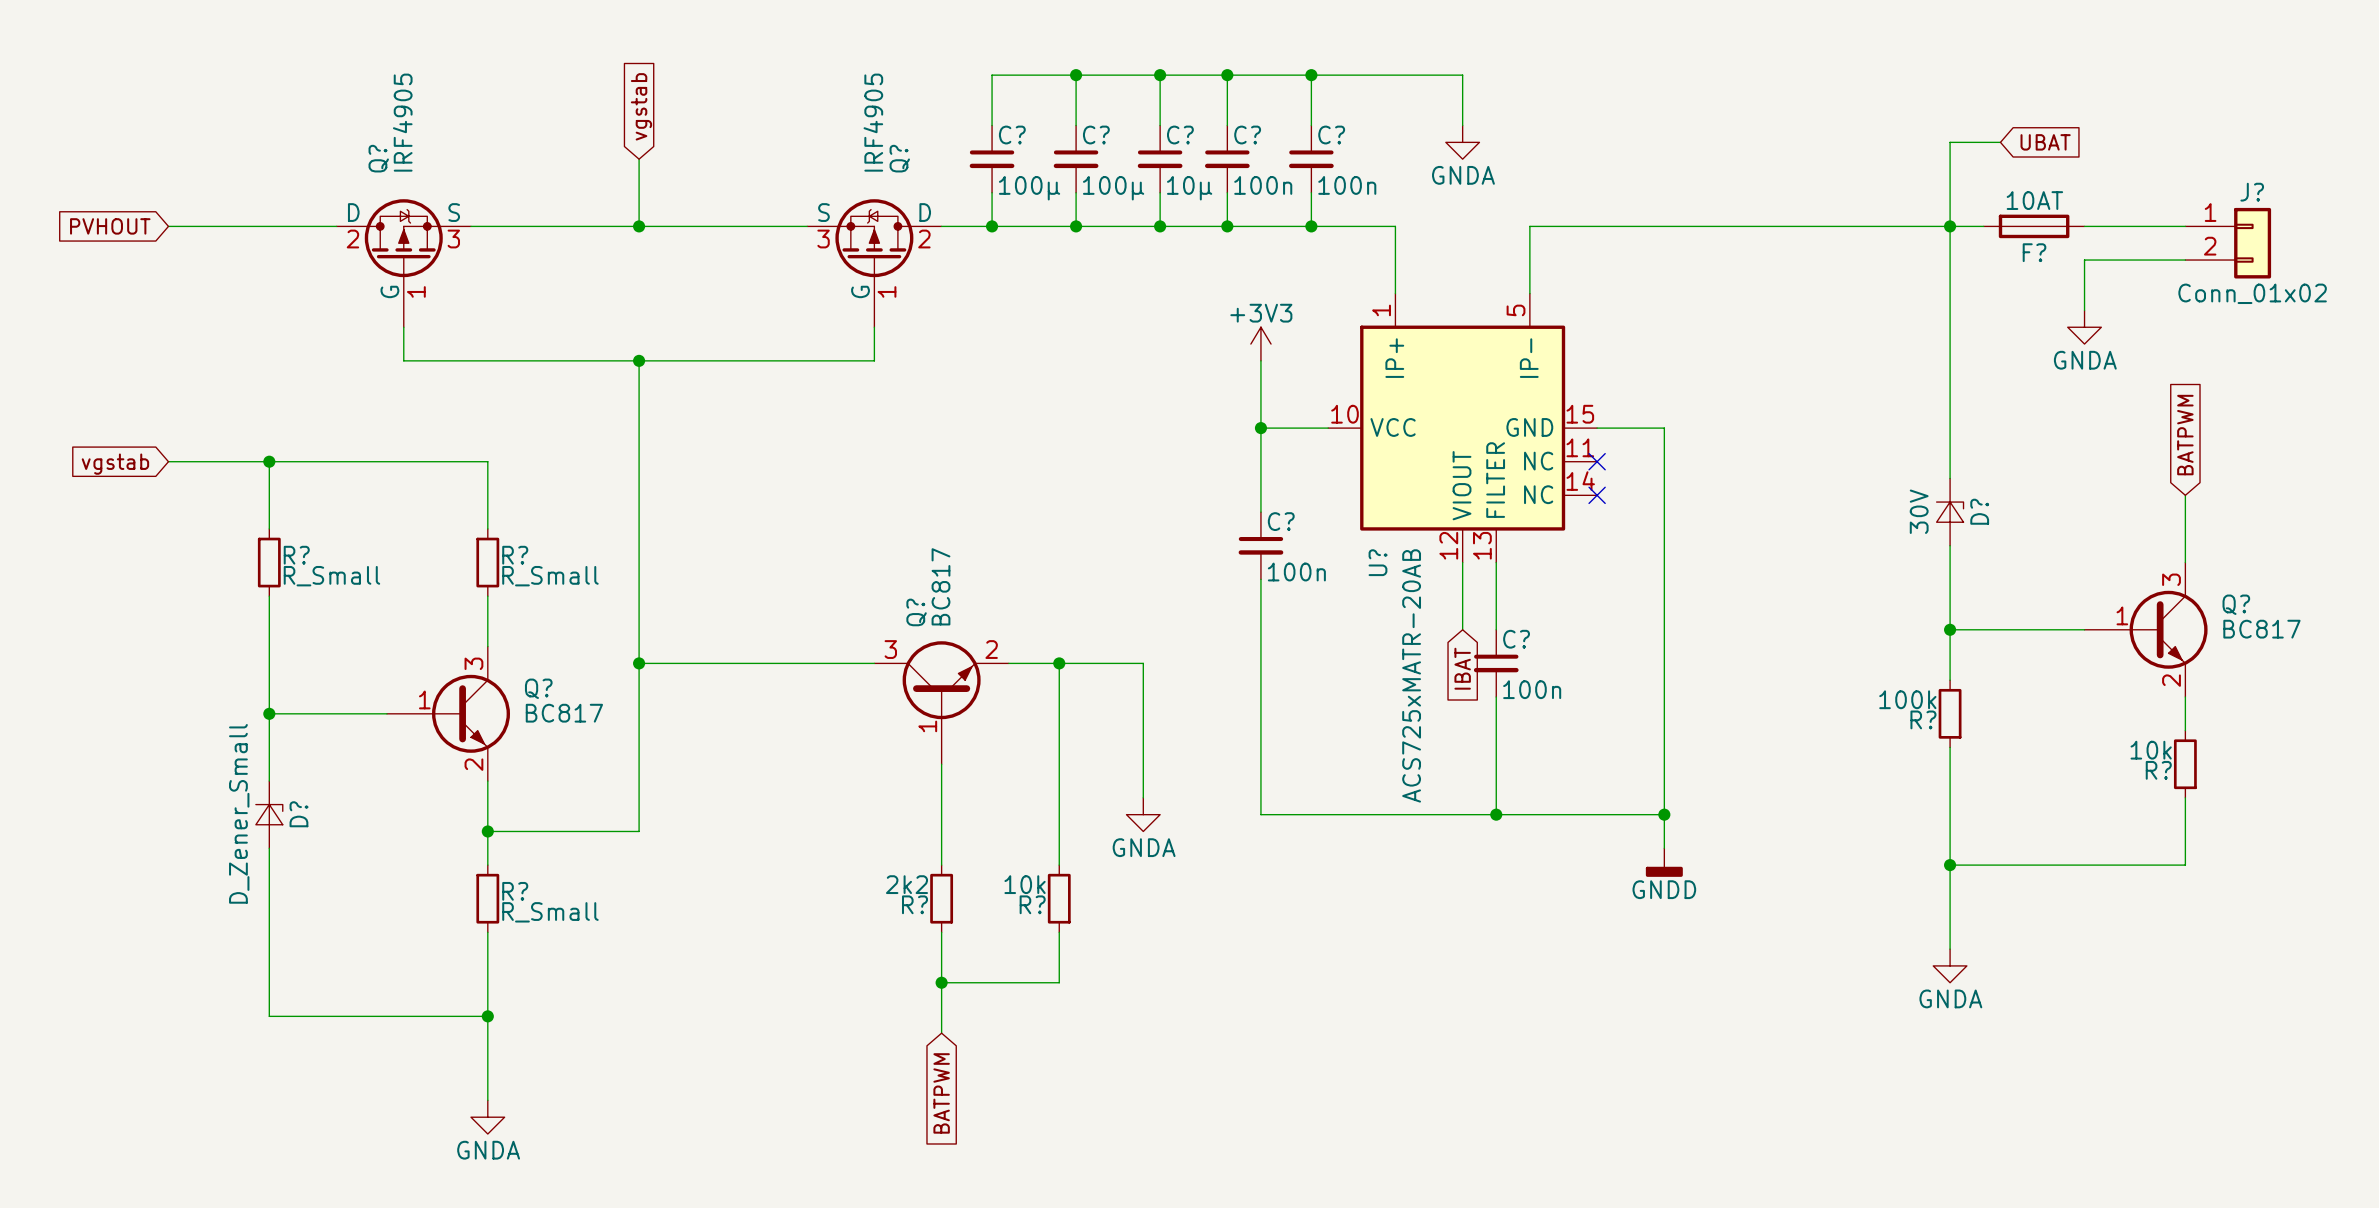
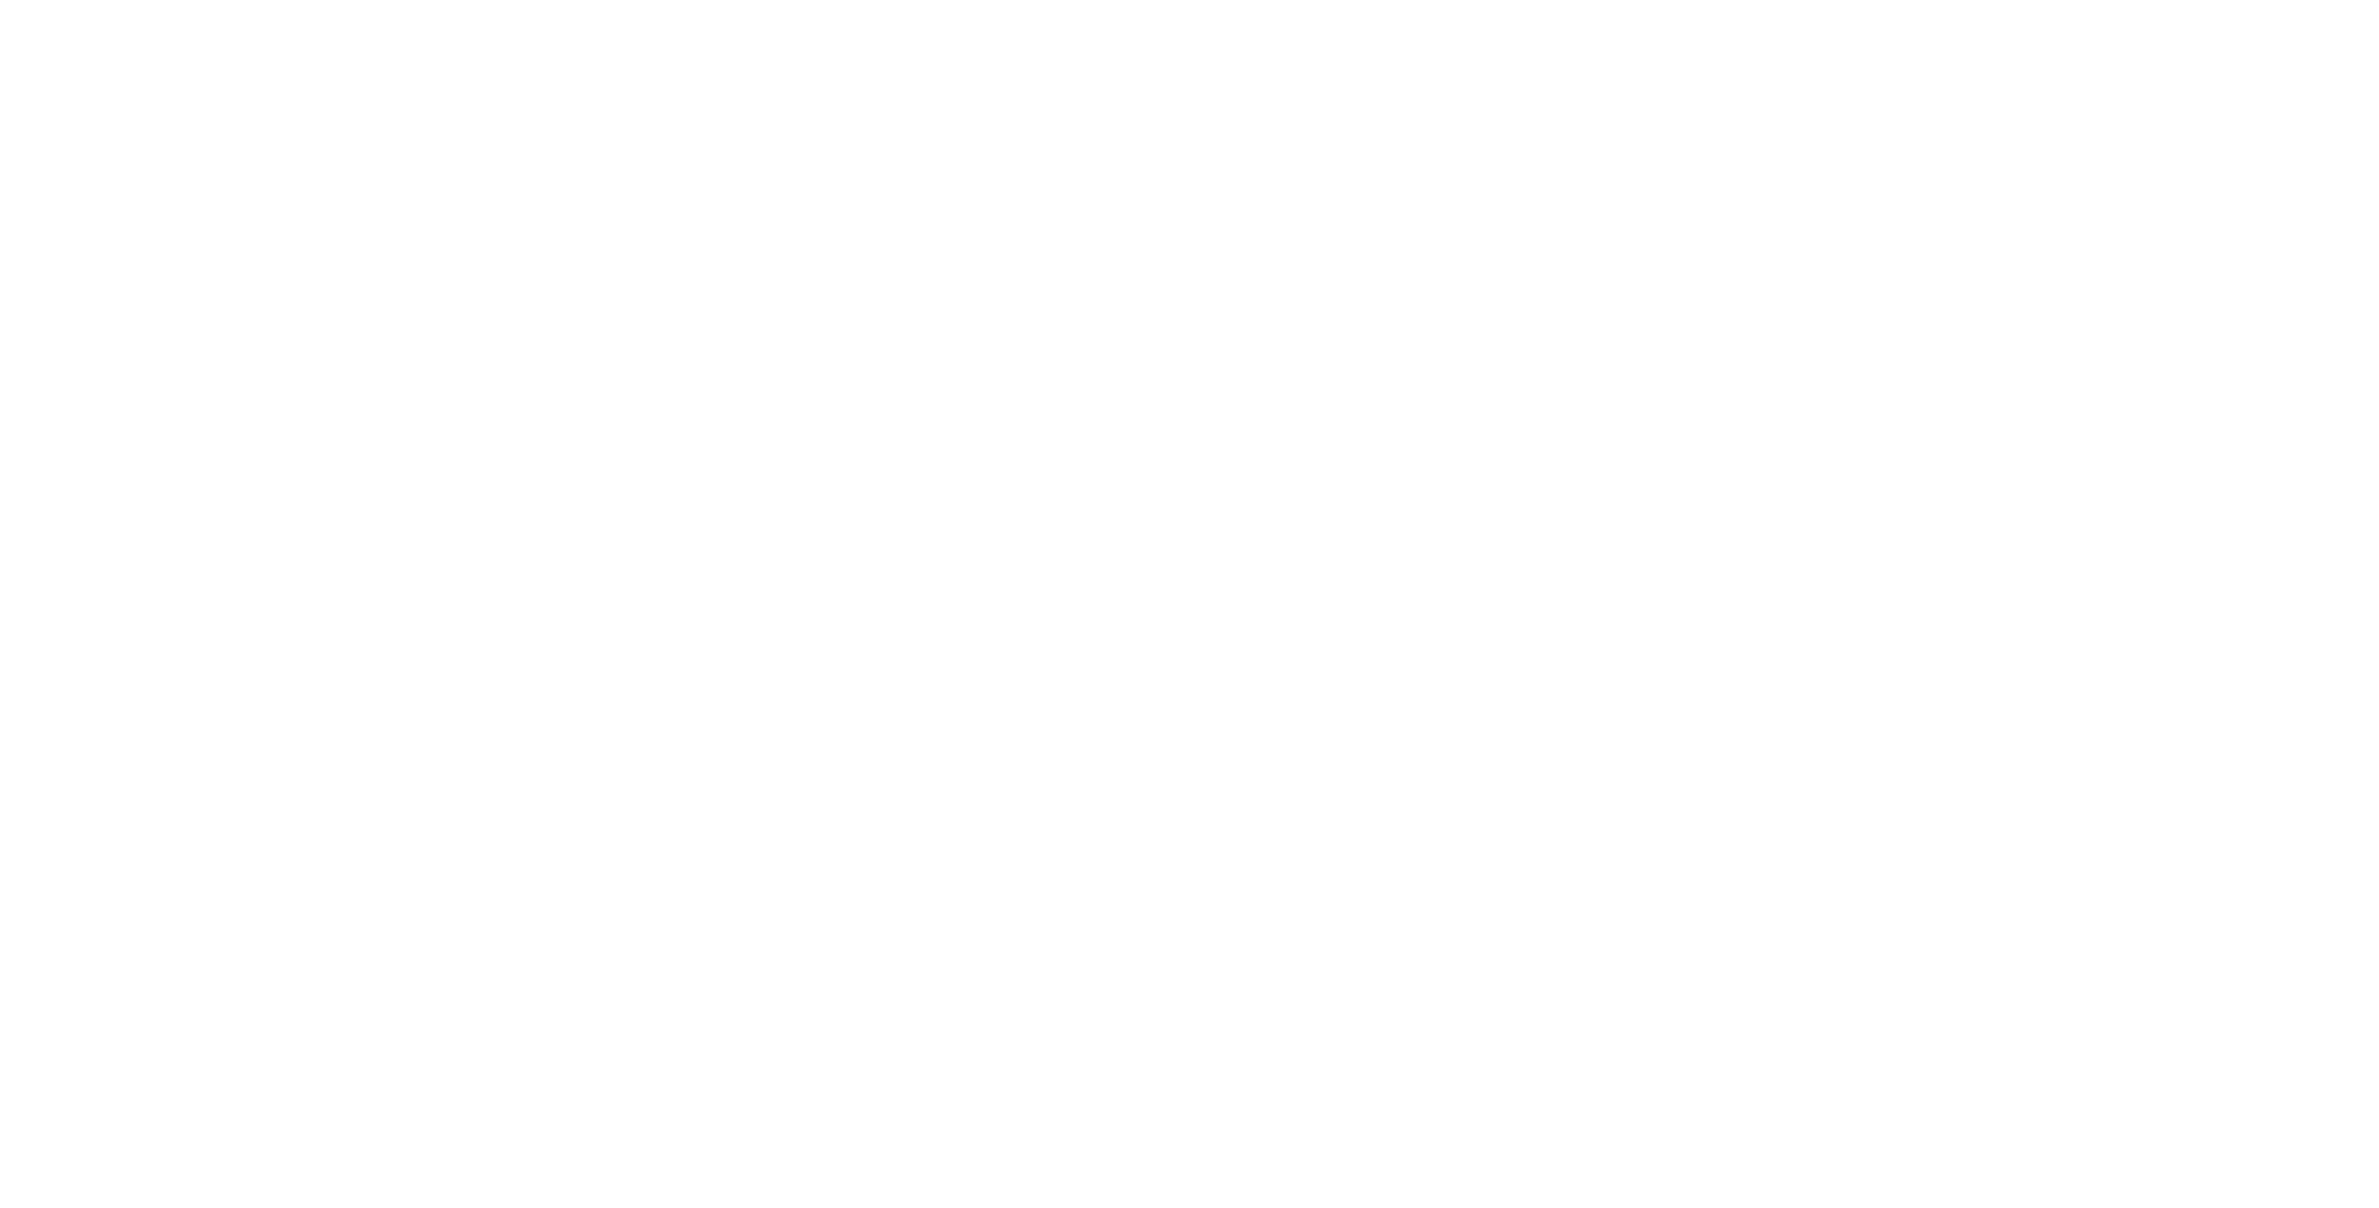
wire: (1076, 75) (1076, 125) -> none
junction: (1076, 75) -> none
wire: (1160, 75) (1160, 125) -> none
junction: (1160, 75) -> none
wire: (1227, 75) (1227, 125) -> none
junction: (1227, 75) -> none
wire: (1311, 75) (1311, 125) -> none
junction: (1311, 75) -> none
global label: vgstab (641, 106) -> none
wire: (992, 125) (992, 75) (1462, 75) (1462, 125) -> none
power symbol: GNDA (1462, 142) -> none
wire: (2000, 142) (1950, 142) (1950, 478) -> none
global label: UBAT (2045, 142) -> none
wire: (639, 159) (639, 226) -> none
C?: 100µ (992, 159) -> none
C?: 100µ (1076, 159) -> none
C?: 10µ (1160, 159) -> none
C?: 100n (1227, 159) -> none
C?: 100n (1311, 159) -> none
wire: (992, 192) (992, 226) -> none
wire: (1076, 192) (1076, 226) -> none
wire: (1160, 192) (1160, 226) -> none
wire: (1227, 192) (1227, 226) -> none
wire: (1311, 192) (1311, 226) -> none
global label: PVHOUT (110, 226) -> none
wire: (168, 226) (336, 226) -> none
wire: (471, 226) (807, 226) -> none
junction: (639, 226) -> none
wire: (941, 226) (1395, 226) (1395, 293) -> none
junction: (992, 226) -> none
junction: (1076, 226) -> none
junction: (1160, 226) -> none
junction: (1227, 226) -> none
junction: (1311, 226) -> none
junction: (1950, 226) -> none
wire: (1983, 226) (1529, 226) (1529, 293) -> none
F?: 10AT (2034, 226) -> none
wire: (2084, 226) (2185, 226) -> none
J?: Conn_01x02 (2228, 243) -> none
wire: (2185, 260) (2084, 260) (2084, 310) -> none
Q?: IRF4905 (403, 263) -> none
Q?: IRF4905 (874, 263) -> none
wire: (403, 327) (403, 360) (874, 360) (874, 327) -> none
power symbol: GNDA (2084, 327) -> none
power symbol: +3V3 (1260, 344) -> none
wire: (639, 360) (639, 831) (487, 831) -> none
junction: (639, 360) -> none
wire: (1260, 360) (1260, 512) -> none
wire: (1260, 428) (1328, 428) -> none
junction: (1260, 428) -> none
U?: ACS725xMATR-20AB (1462, 428) -> none
wire: (1597, 428) (1664, 428) (1664, 848) -> none
global label: BATPWM (2185, 435) -> none
wire: (168, 461) (487, 461) (487, 528) -> none
wire: (269, 461) (269, 528) -> none
junction: (269, 461) -> none
no-connect mark: (1597, 461) -> none
global label: vgstab (115, 464) -> none
no-connect mark: (1597, 495) -> none
wire: (2185, 495) (2185, 562) -> none
D?: 30V (1950, 512) -> none
C?: 100n (1260, 545) -> none
wire: (1950, 545) (1950, 680) -> none
R?: R_Small (269, 562) -> none
R?: R_Small (487, 562) -> none
wire: (1462, 562) (1462, 629) -> none
wire: (1496, 562) (1496, 629) -> none
wire: (1260, 579) (1260, 814) (1664, 814) -> none
wire: (269, 596) (269, 781) -> none
wire: (487, 596) (487, 646) -> none
wire: (1950, 629) (2084, 629) -> none
junction: (1950, 629) -> none
Q?: BC817 (2146, 629) -> none
wire: (639, 663) (874, 663) -> none
junction: (639, 663) -> none
wire: (1008, 663) (1143, 663) (1143, 797) -> none
wire: (1059, 663) (1059, 865) -> none
junction: (1059, 663) -> none
C?: 100n (1496, 663) -> none
global label: IBAT (1462, 668) -> none
wire: (1496, 697) (1496, 814) -> none
wire: (2185, 697) (2185, 730) -> none
Q?: BC817 (941, 702) -> none
wire: (269, 713) (386, 713) -> none
junction: (269, 713) -> none
Q?: BC817 (448, 713) -> none
R?: 100k (1950, 713) -> none
wire: (1950, 747) (1950, 949) -> none
wire: (941, 764) (941, 865) -> none
R?: 10k (2185, 764) -> none
wire: (487, 781) (487, 865) -> none
wire: (2185, 797) (2185, 865) (1950, 865) -> none
D?: D_Zener_Small (269, 814) -> none
power symbol: GNDA (1143, 814) -> none
junction: (1496, 814) -> none
junction: (1664, 814) -> none
junction: (487, 831) -> none
wire: (269, 848) (269, 1016) (487, 1016) -> none
power symbol: GNDD (1664, 862) -> none
junction: (1950, 865) -> none
R?: R_Small (487, 898) -> none
R?: 2k2 (941, 898) -> none
R?: 10k (1059, 898) -> none
wire: (487, 932) (487, 1100) -> none
wire: (941, 932) (941, 1033) -> none
wire: (1059, 932) (1059, 982) (941, 982) -> none
power symbol: GNDA (1950, 965) -> none
junction: (941, 982) -> none
junction: (487, 1016) -> none
global label: BATPWM (941, 1093) -> none
power symbol: GNDA (487, 1117) -> none

